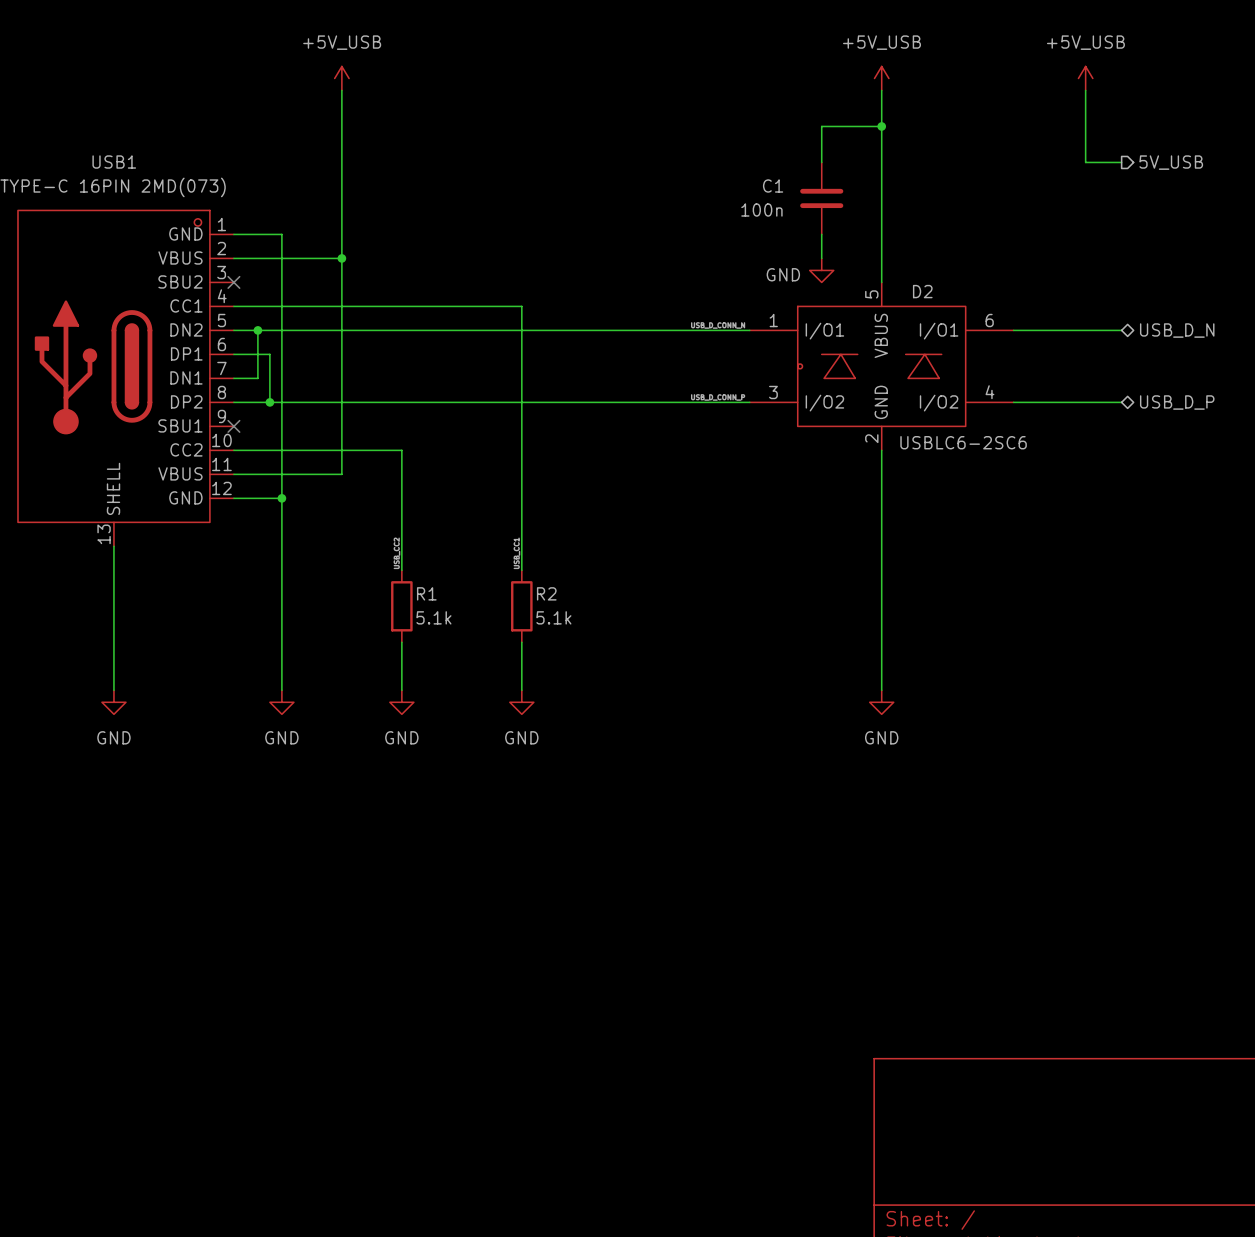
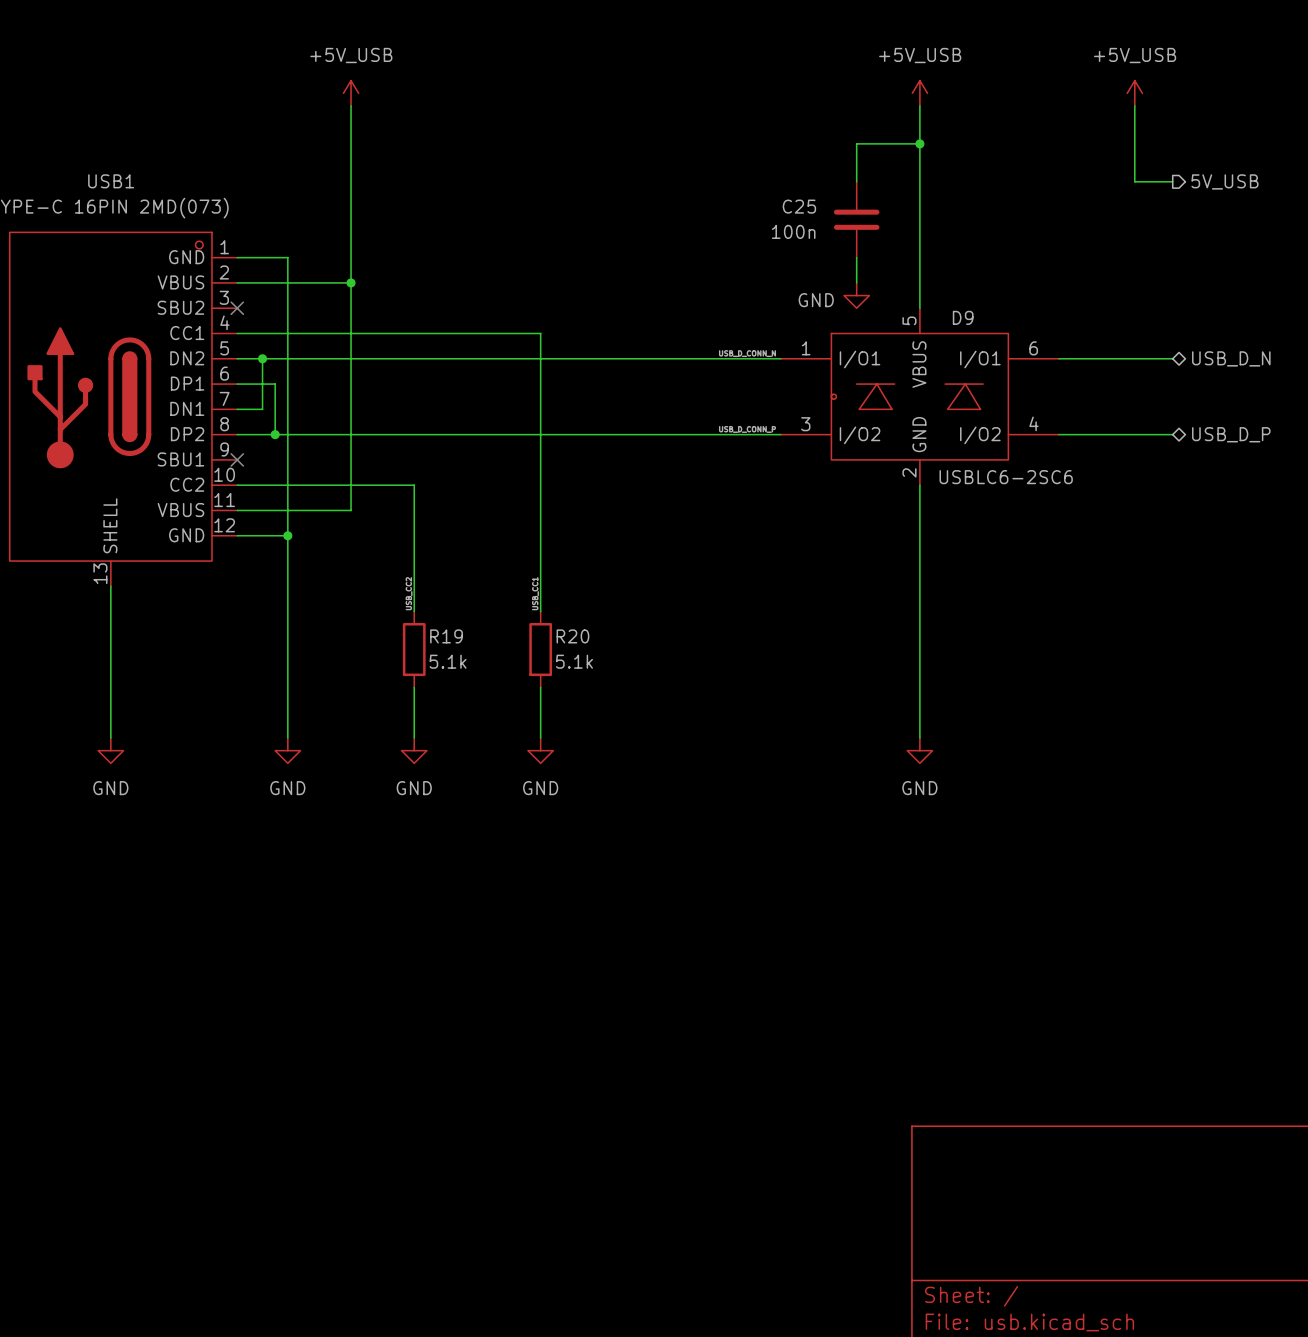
C1 name: C1 (773, 186) -> C25 (799, 206)
D2 name: D2 (922, 291) -> D9 (963, 317)
R1 name: R1 (426, 593) -> R19 (446, 636)
R2 name: R2 (546, 593) -> R20 (572, 636)

